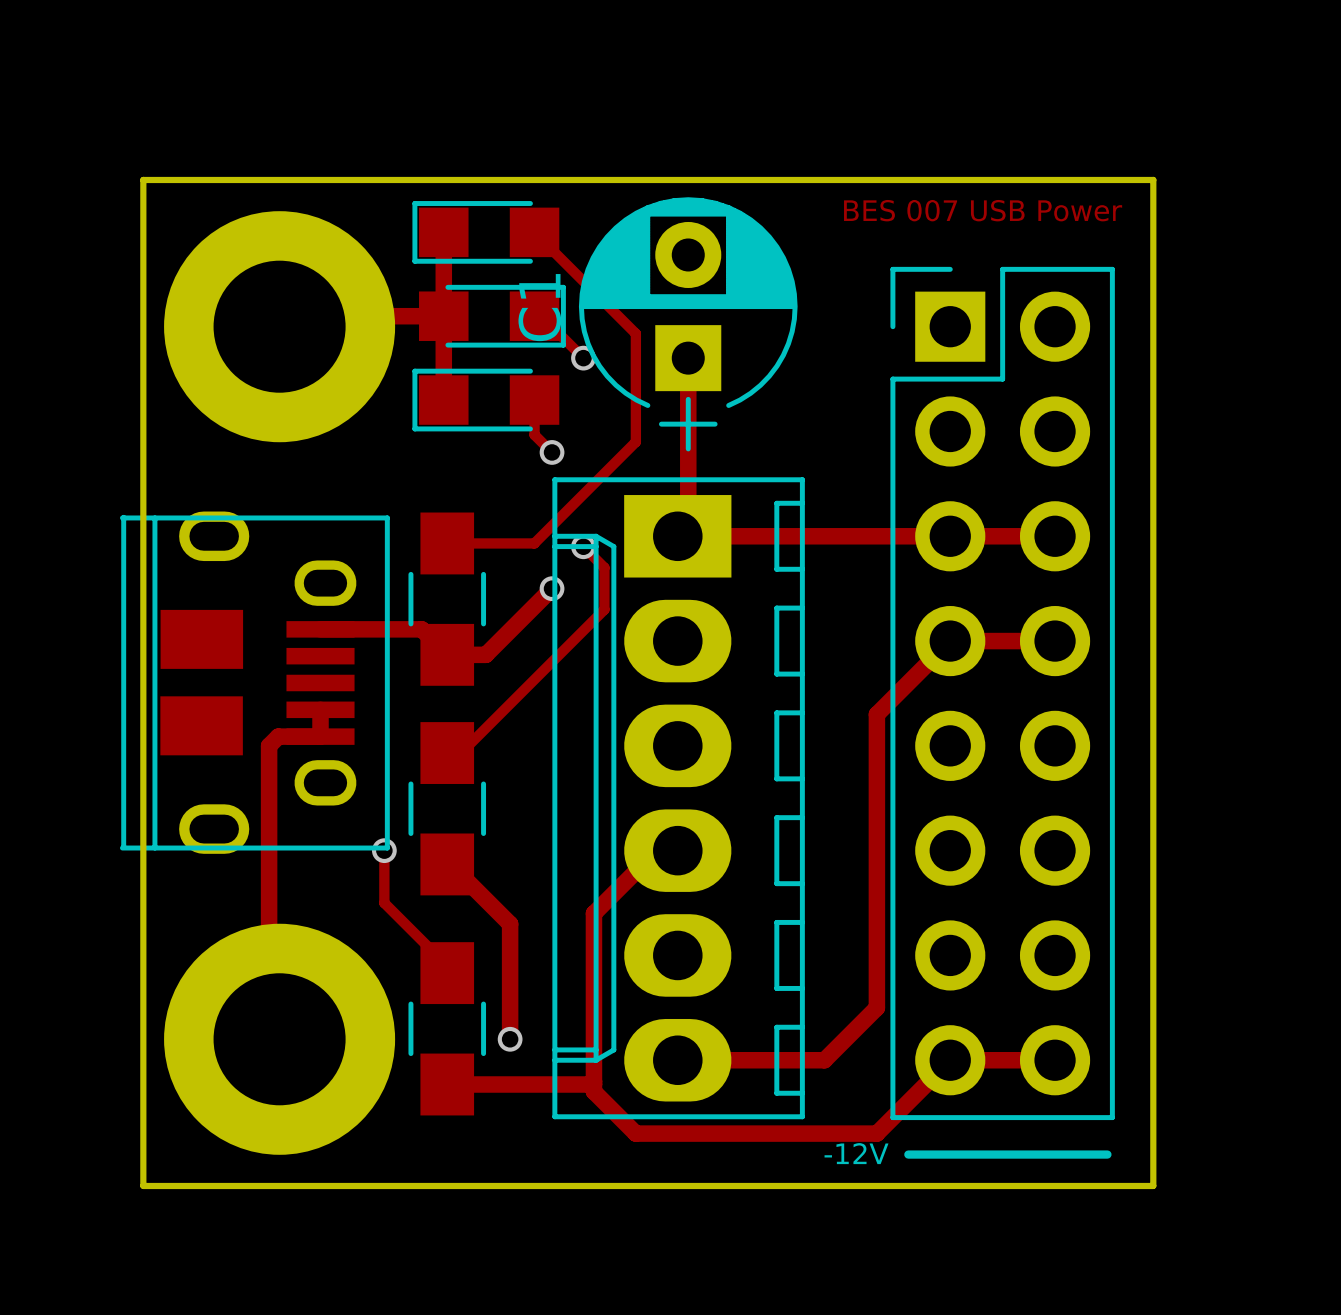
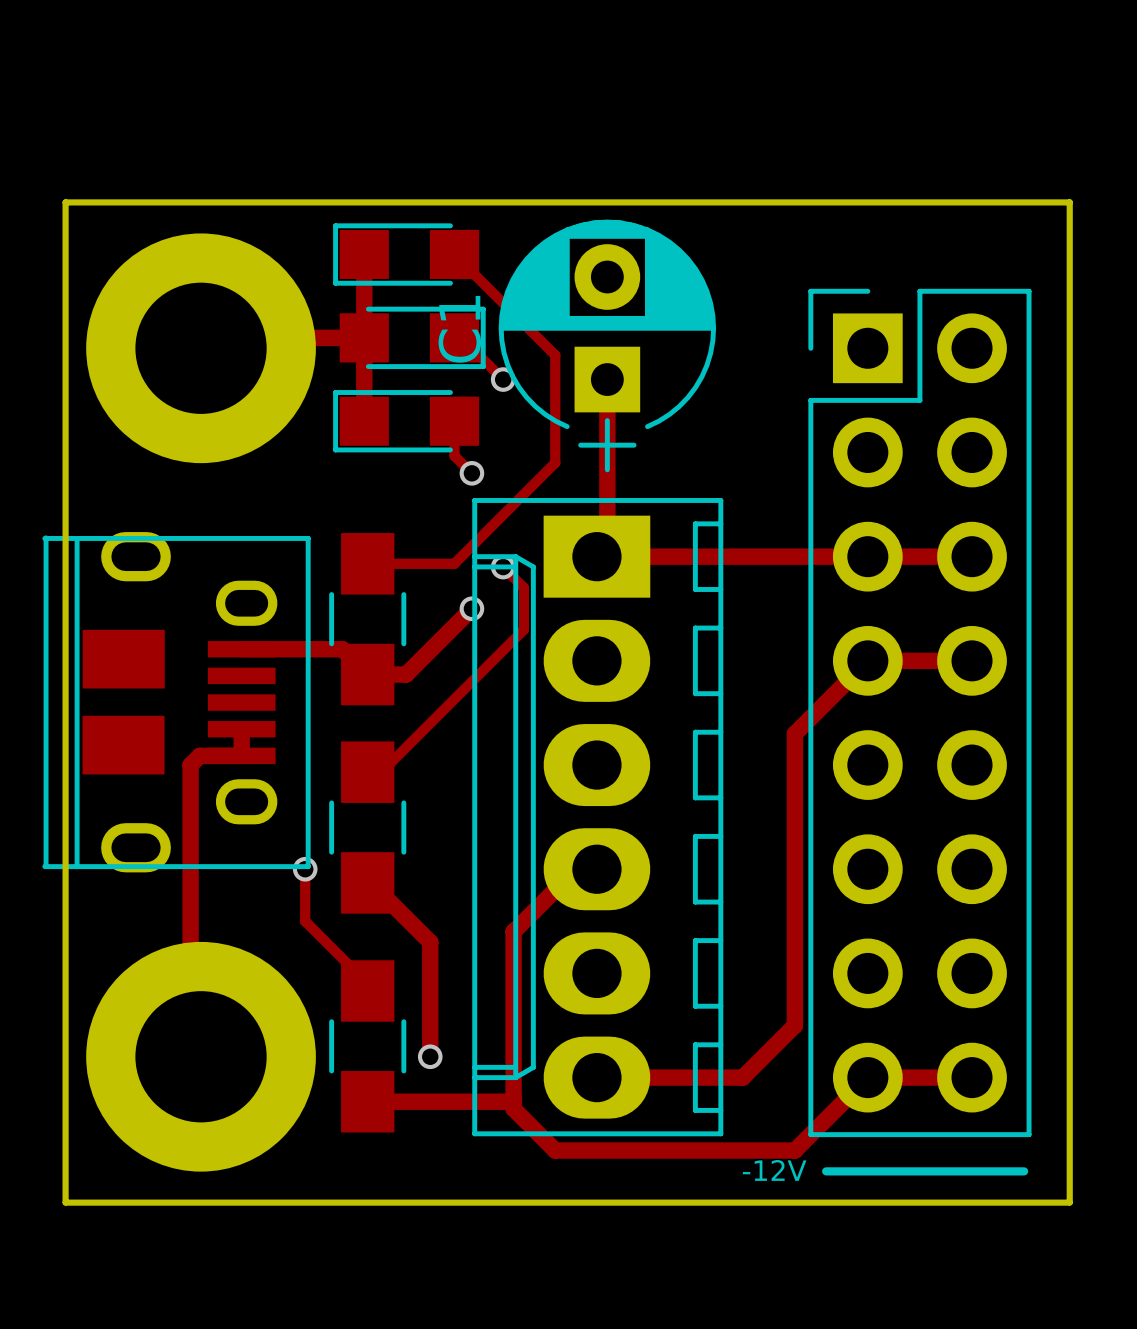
text: BES 007 USB Power (983, 210) -> none

